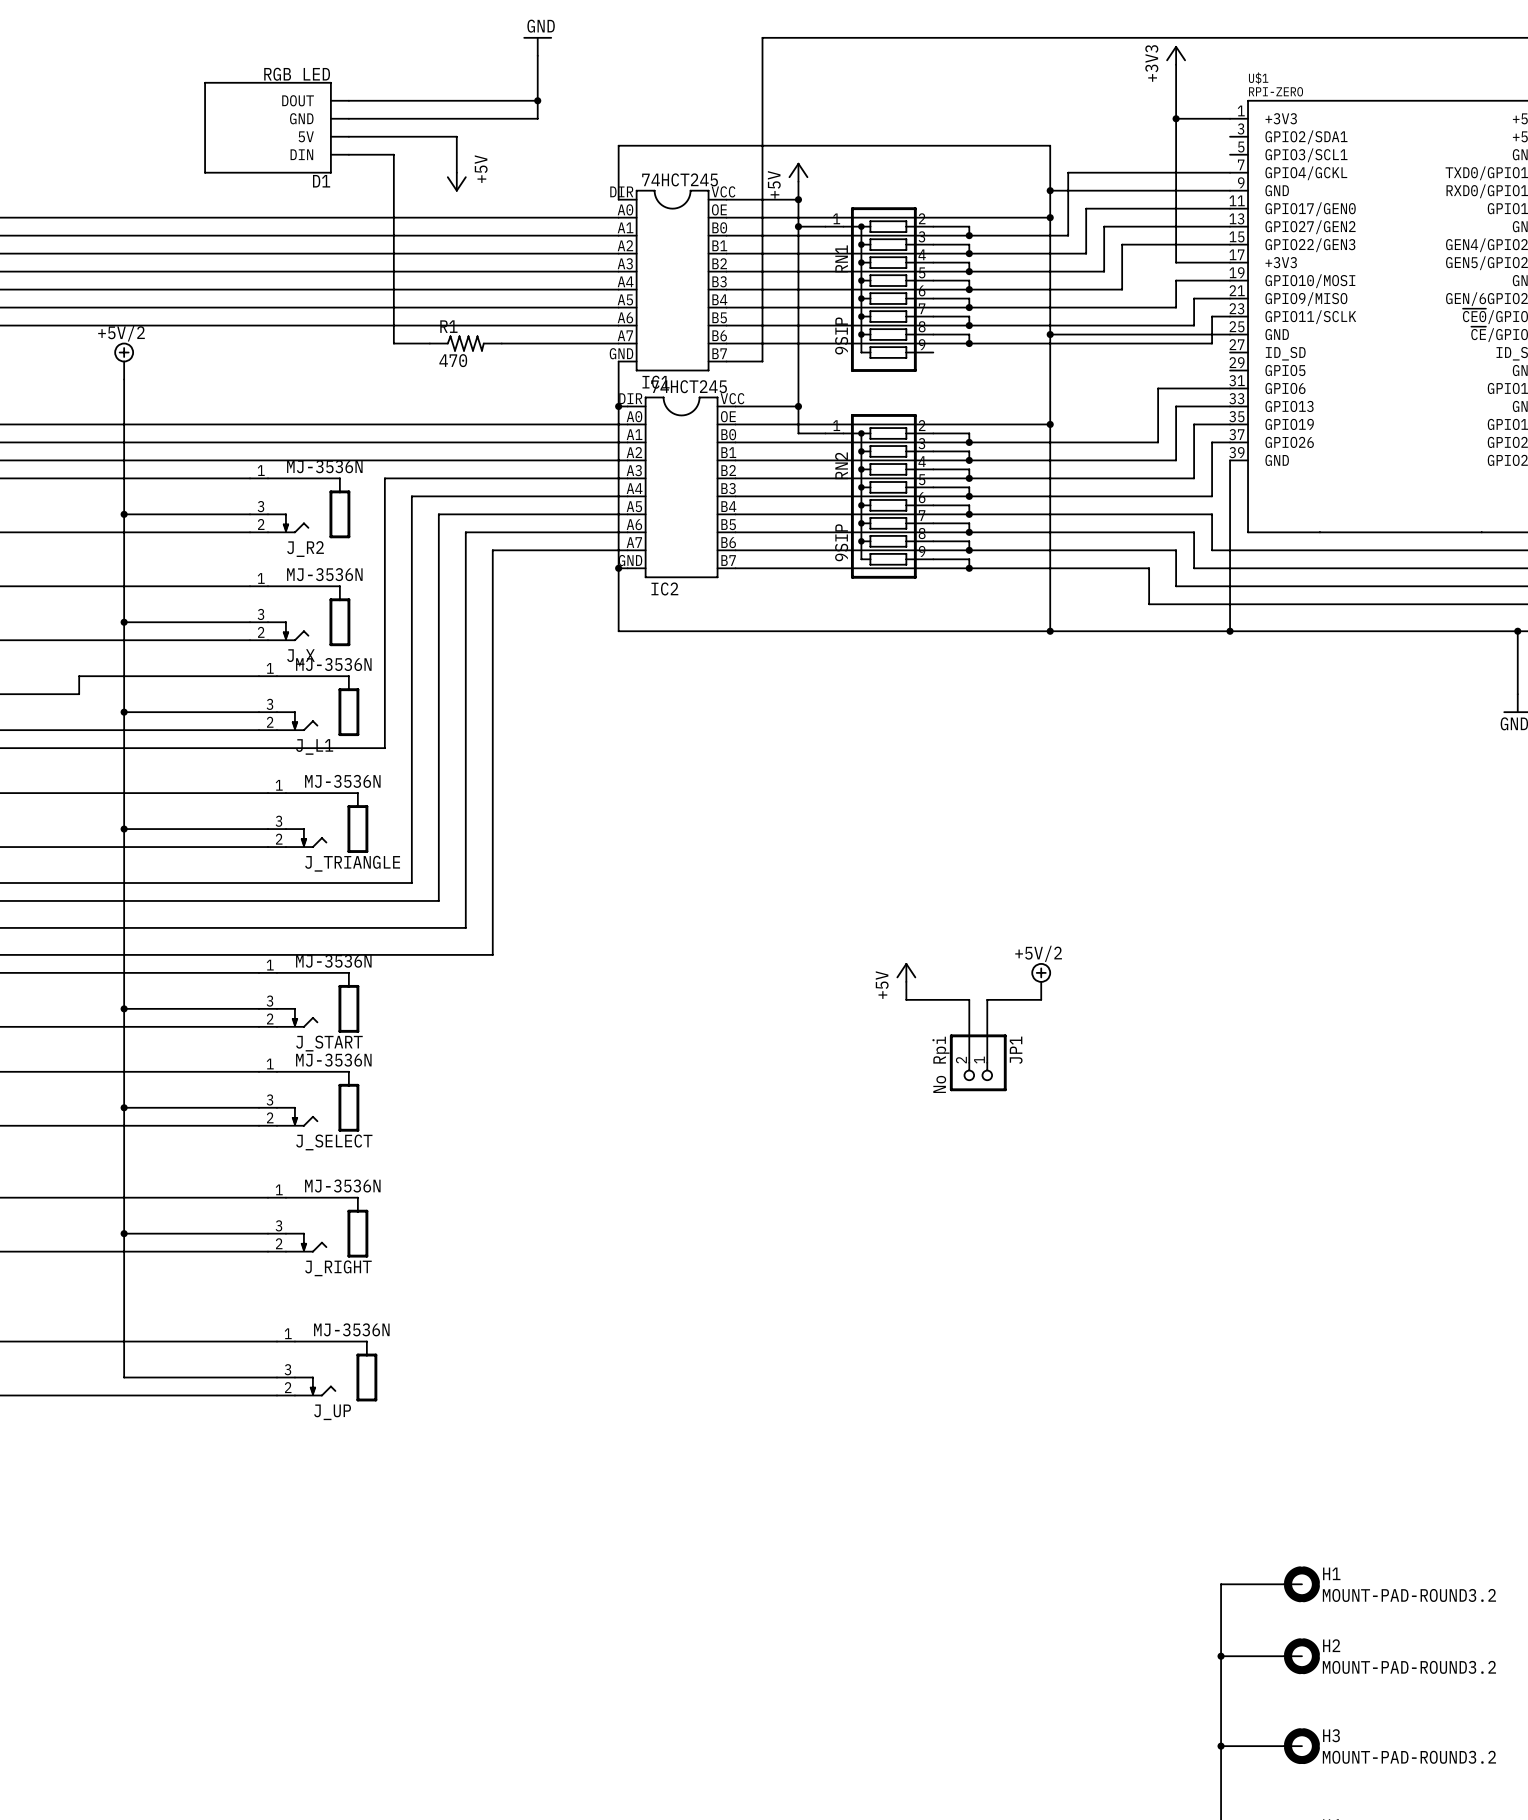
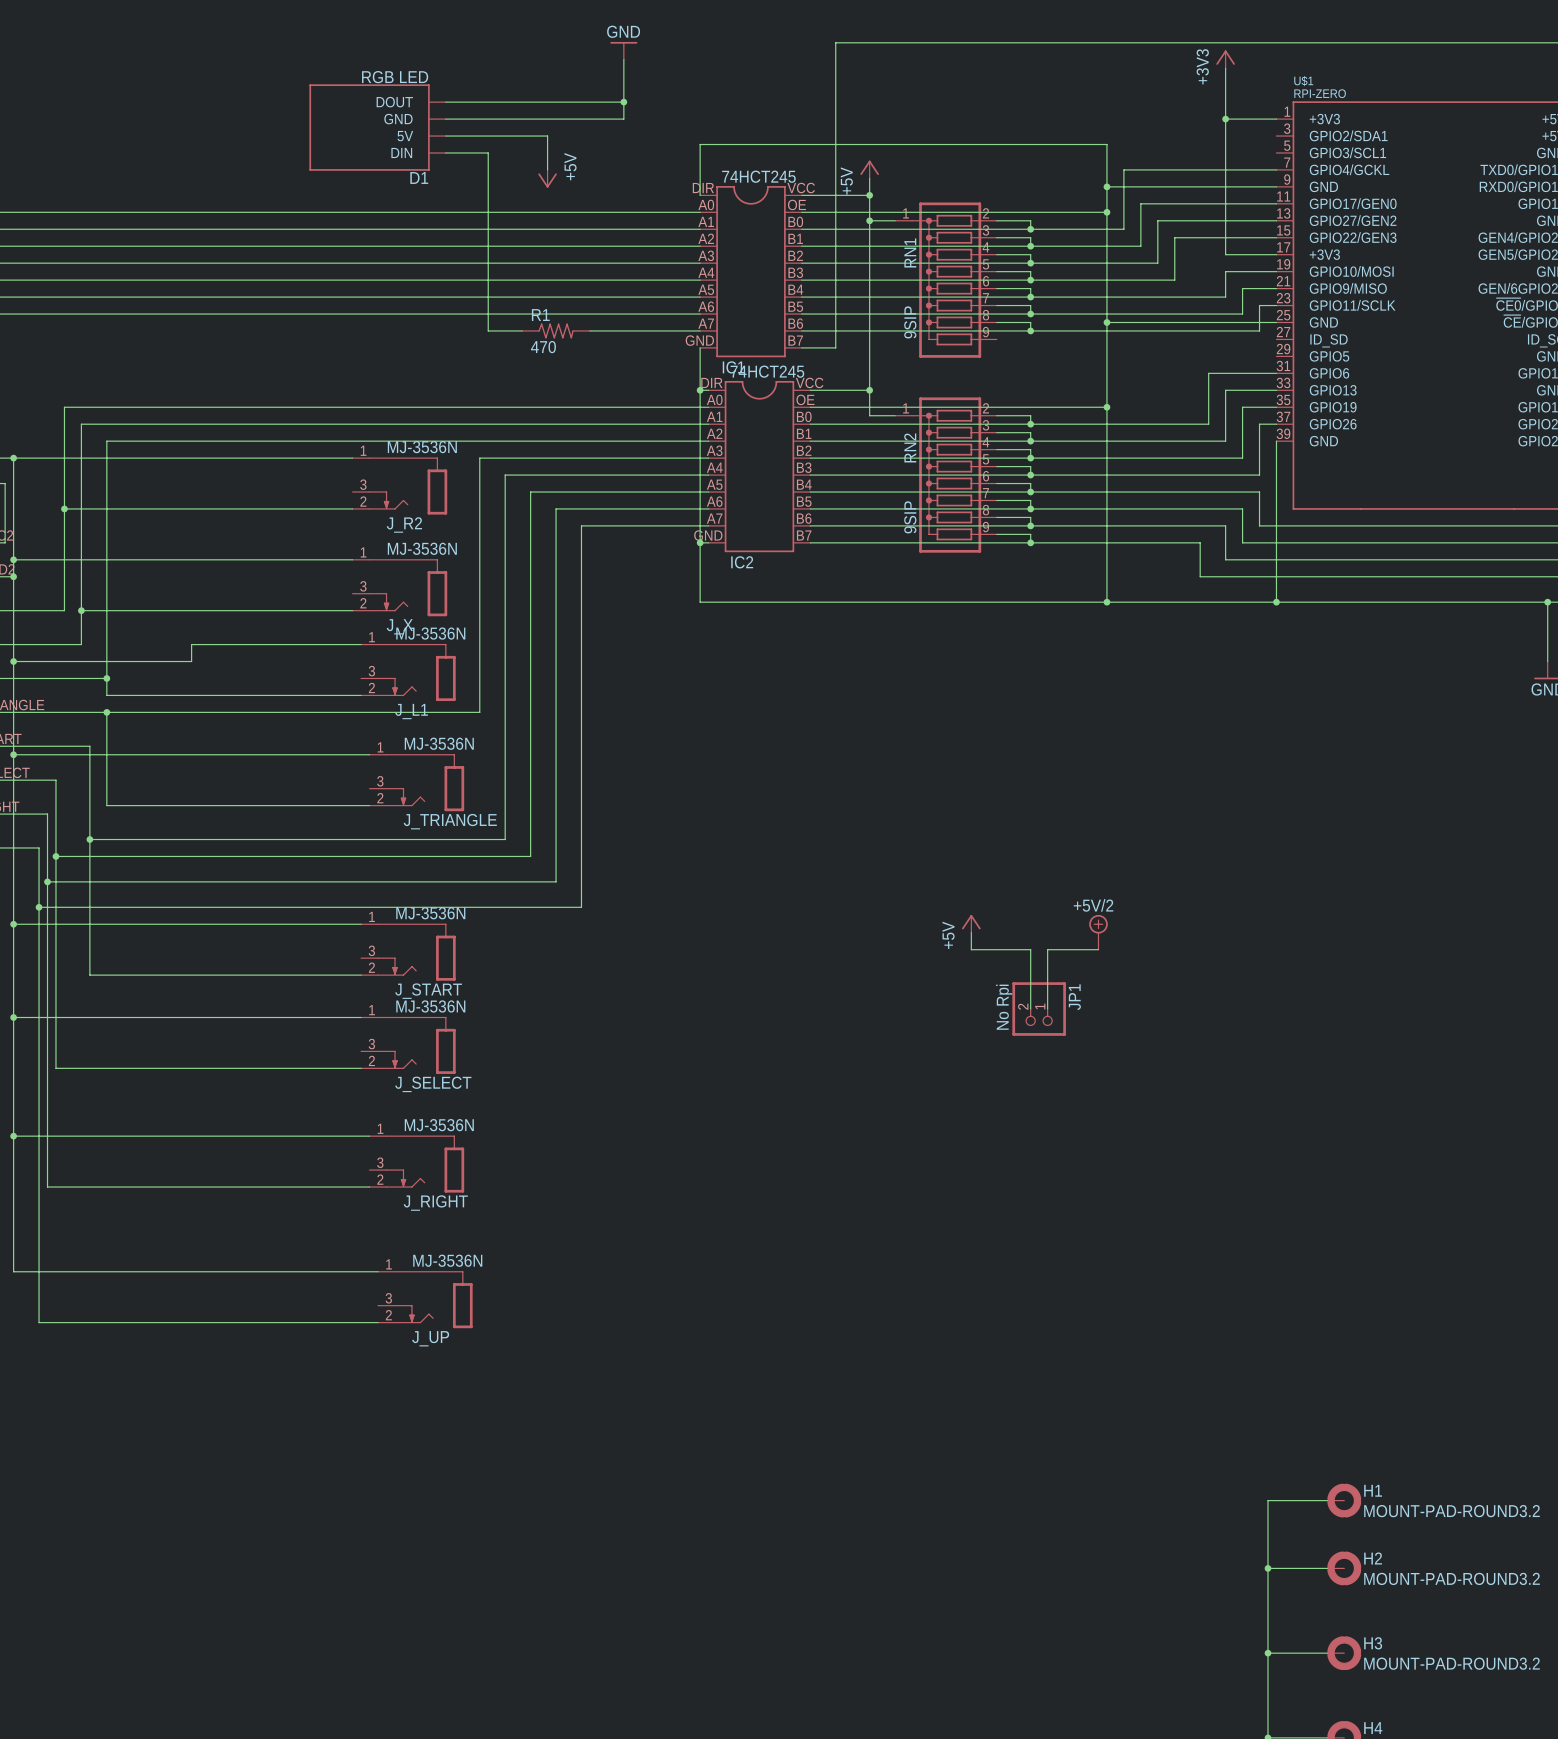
power symbol: +5V/2 (124, 361) -> none
wire: (124, 379) (124, 1377) (276, 1377) -> none
wire: (124, 514) (250, 514) -> none
junction: (124, 514) -> none
wire: (124, 622) (250, 622) -> none
junction: (124, 622) -> none
wire: (124, 712) (259, 712) -> none
junction: (124, 712) -> none
wire: (124, 829) (267, 829) -> none
junction: (124, 829) -> none
wire: (124, 1008) (259, 1008) -> none
junction: (124, 1008) -> none
wire: (124, 1107) (259, 1107) -> none
junction: (124, 1107) -> none
wire: (124, 1233) (267, 1233) -> none
junction: (124, 1233) -> none

